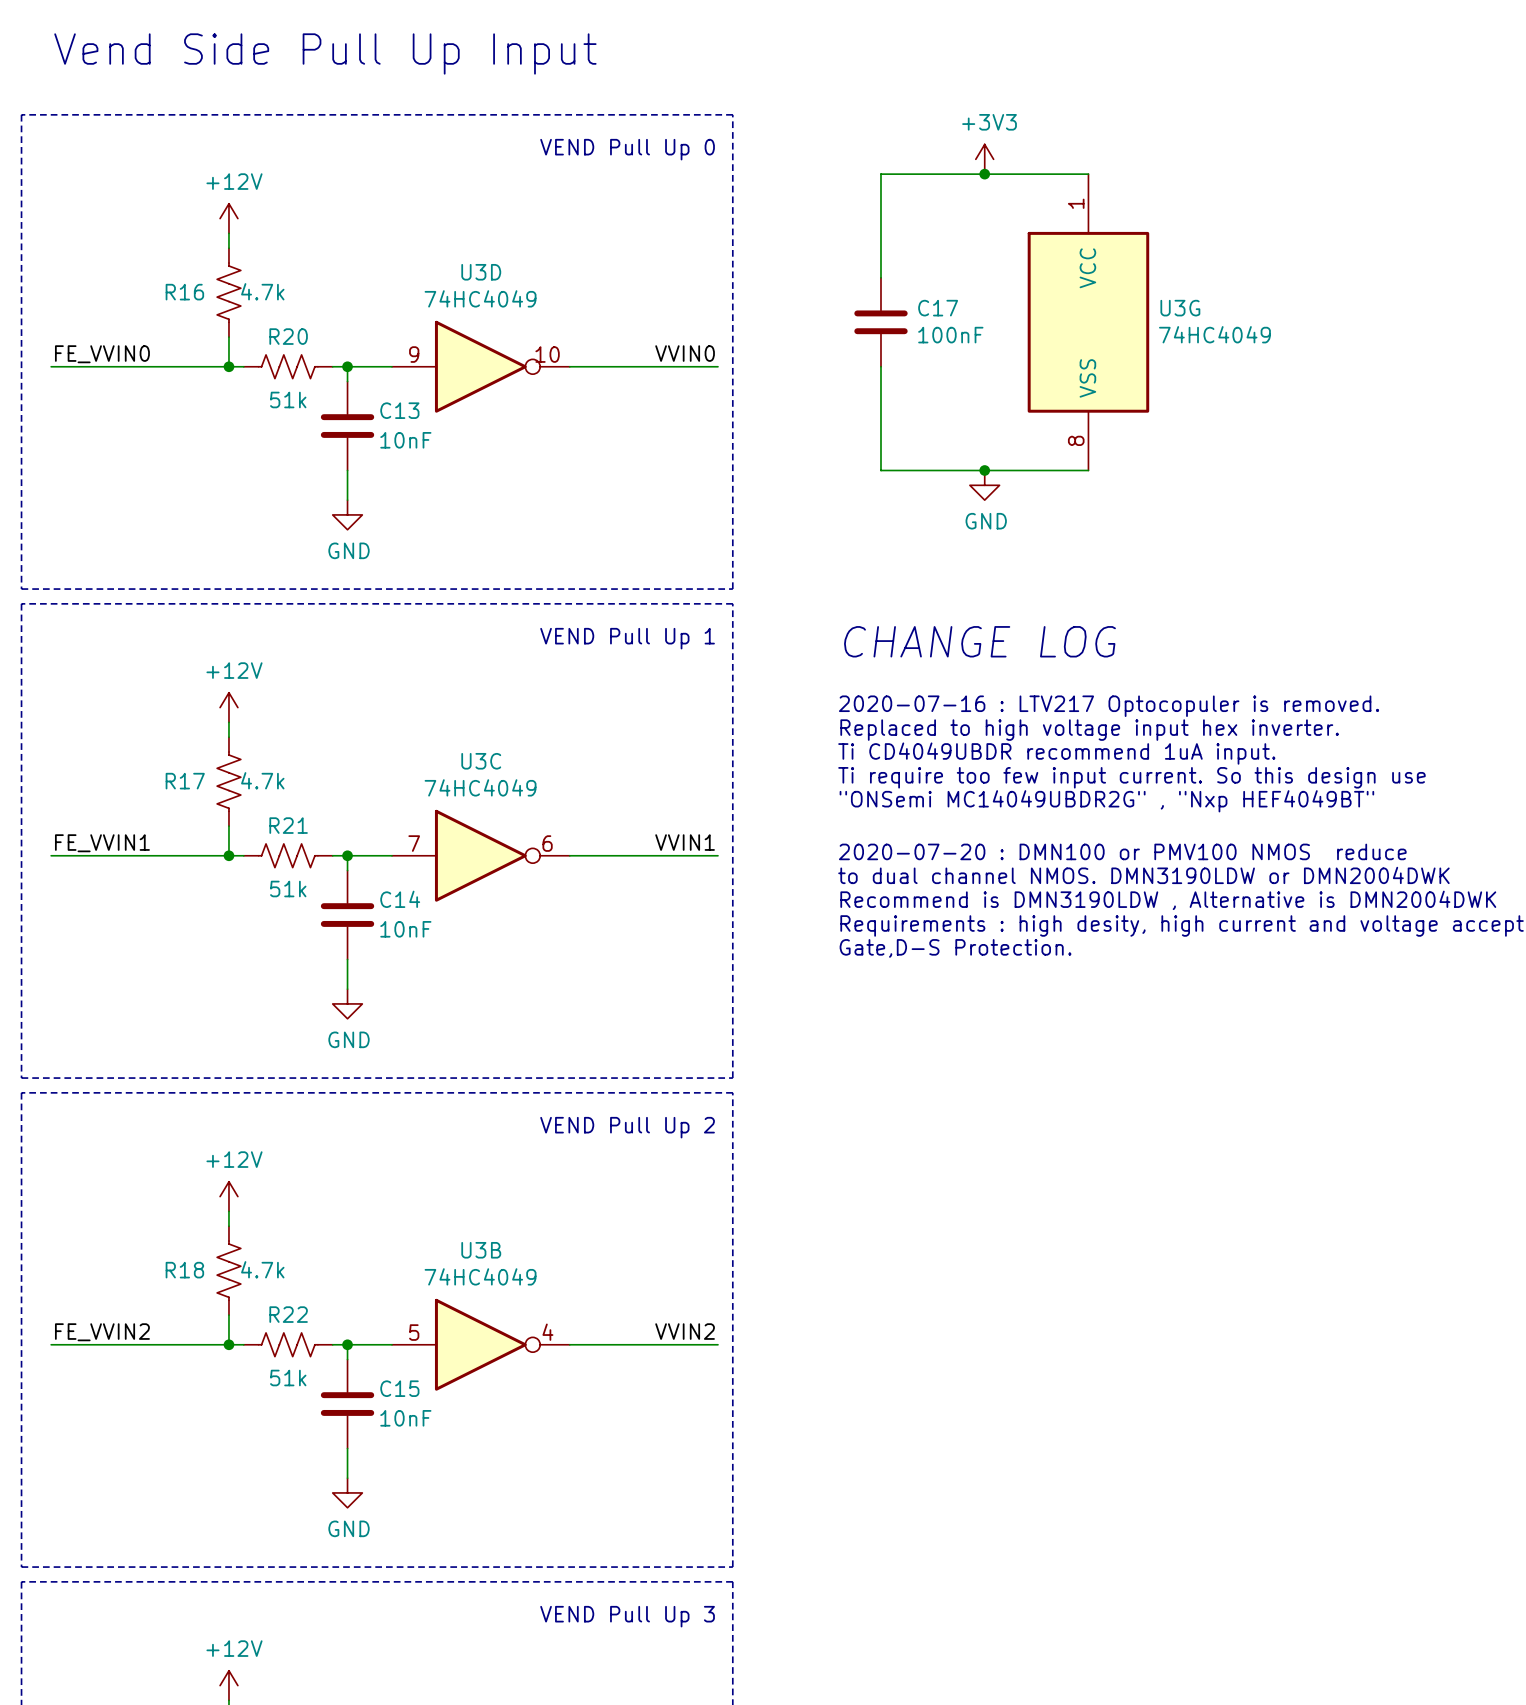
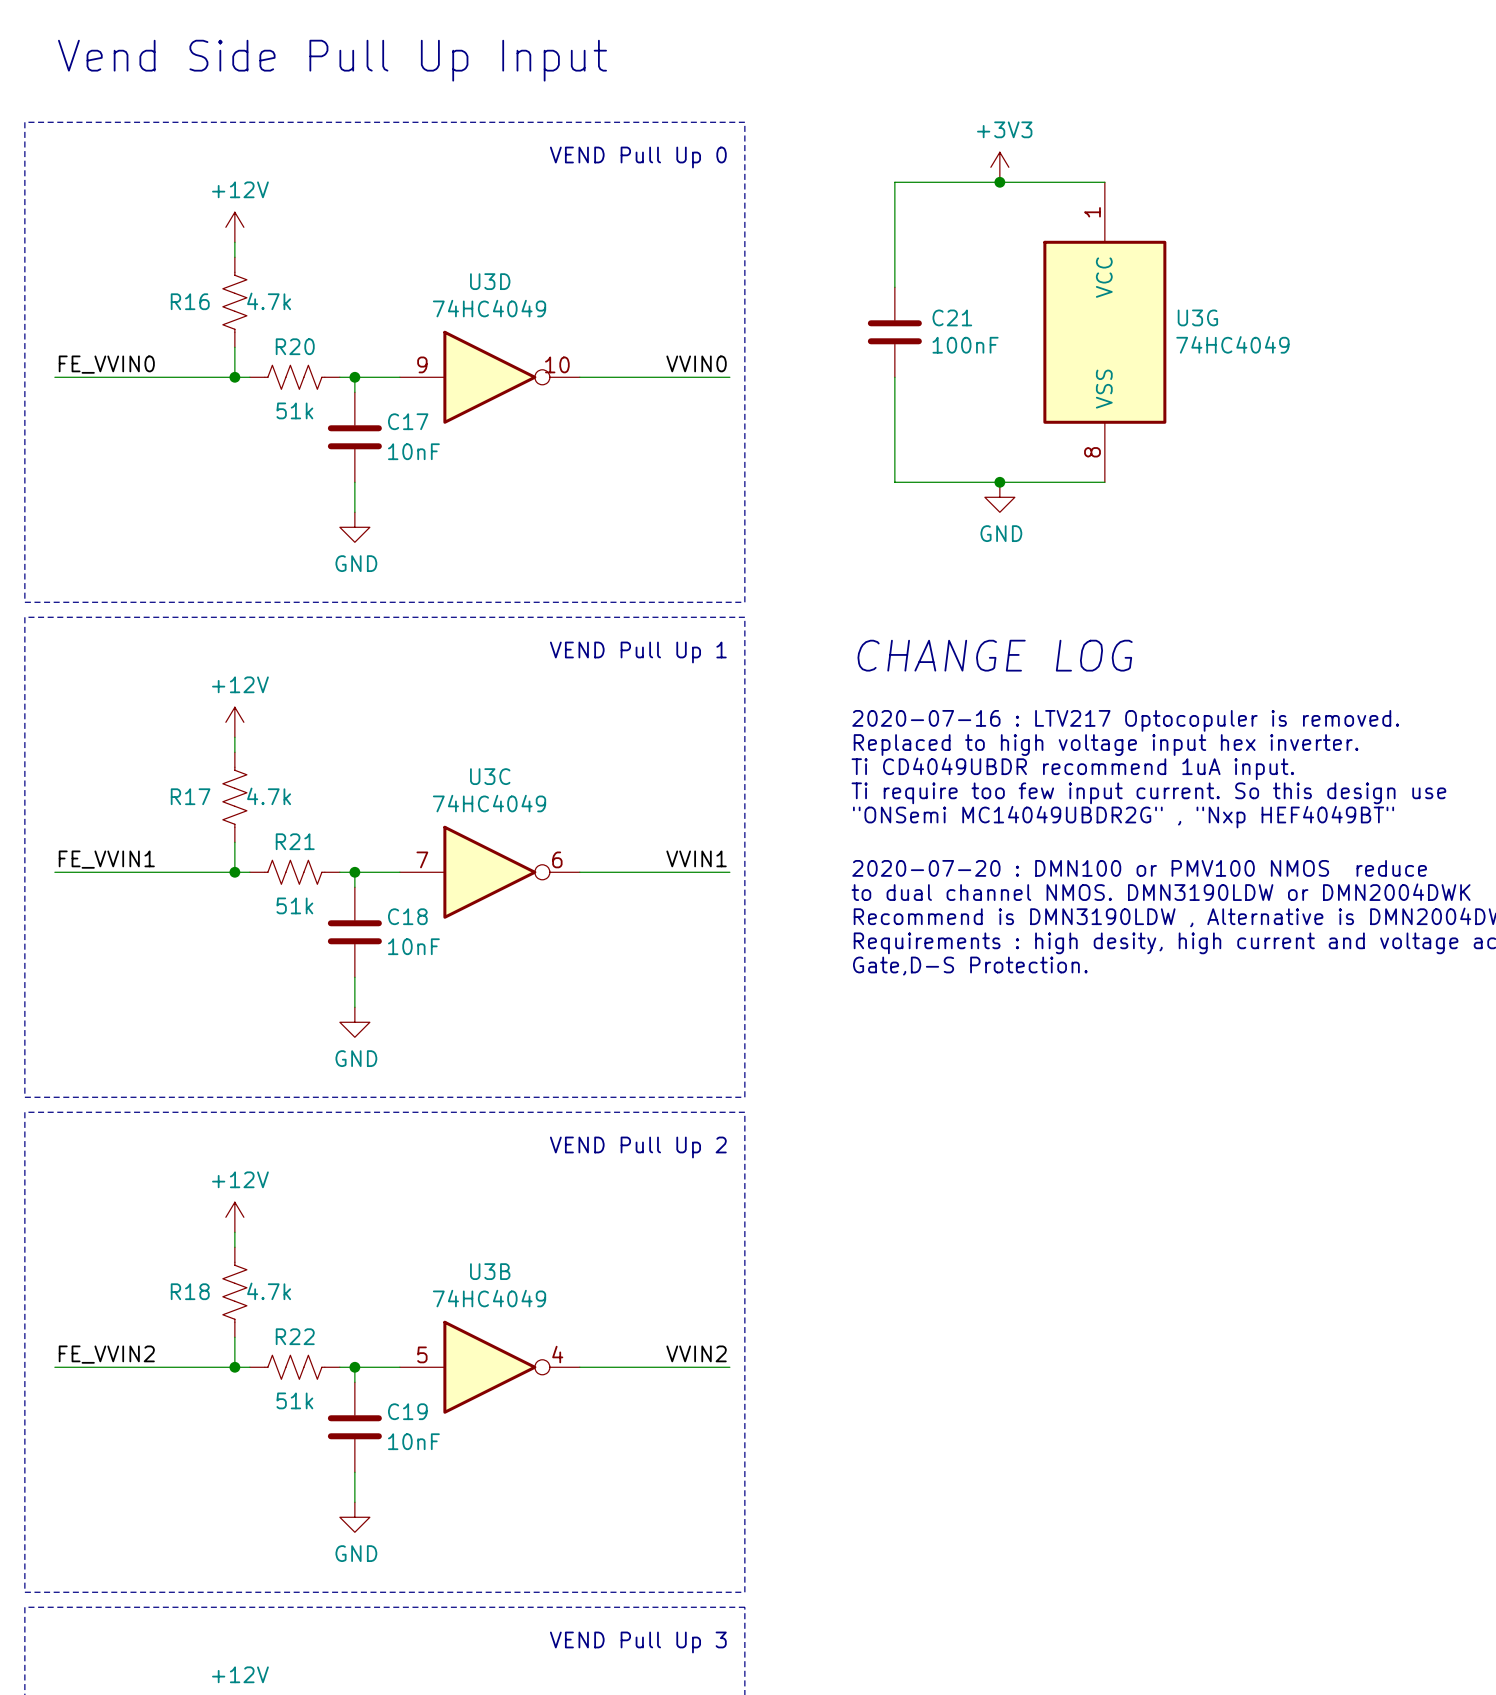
C17 name: C17 (938, 308) -> C21 (952, 317)
C13 name: C13 (399, 410) -> C17 (408, 421)
C14 name: C14 (400, 899) -> C18 (407, 916)
C15 name: C15 (399, 1388) -> C19 (407, 1411)

